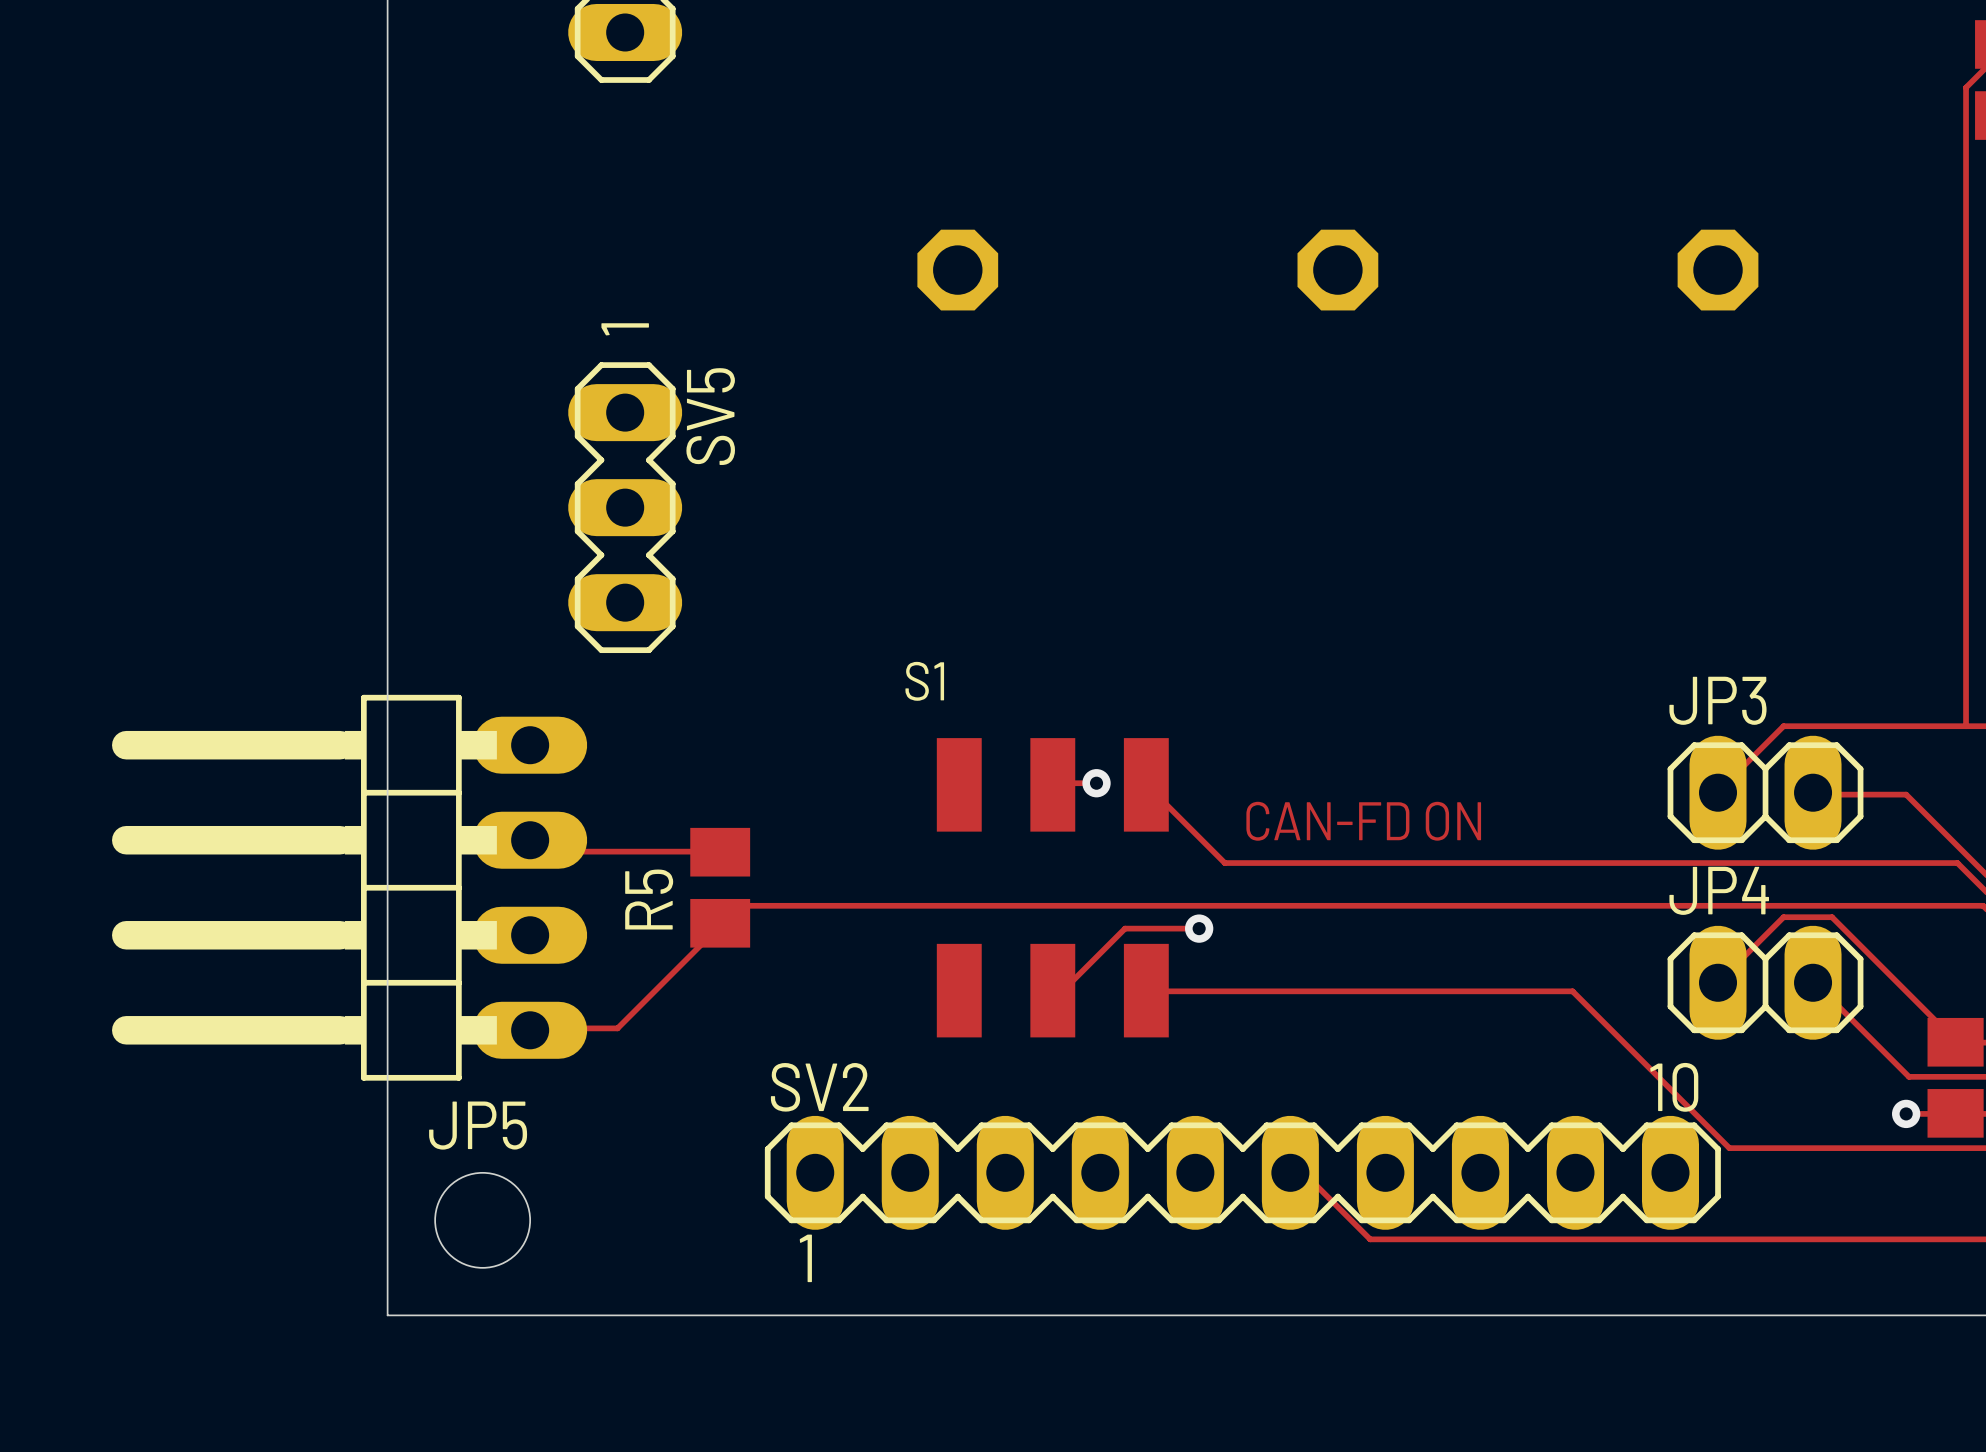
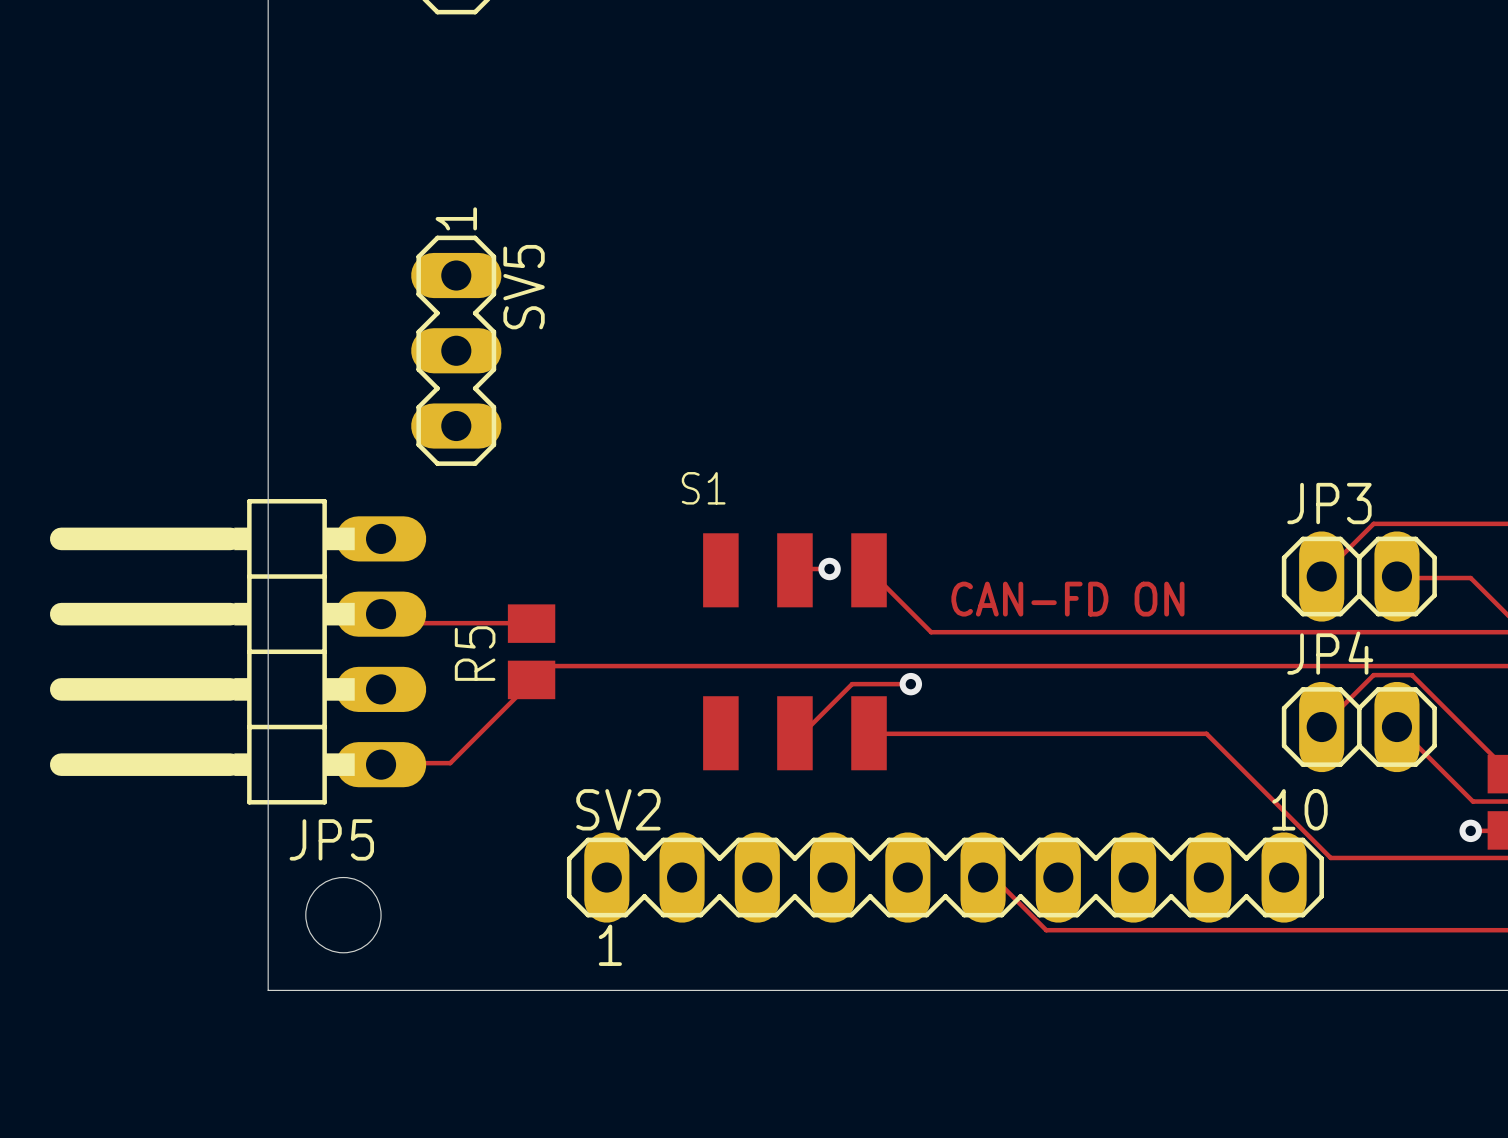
part: (957, 270) -> none
part: (1337, 270) -> none
part: (1718, 270) -> none

